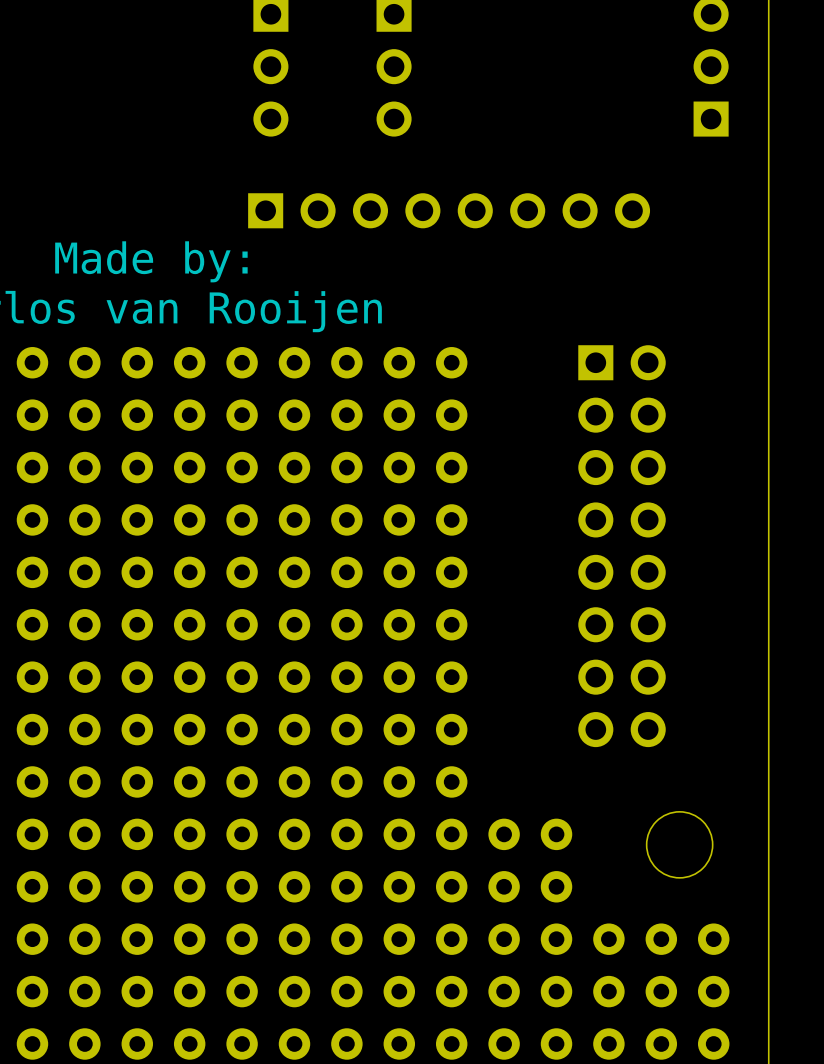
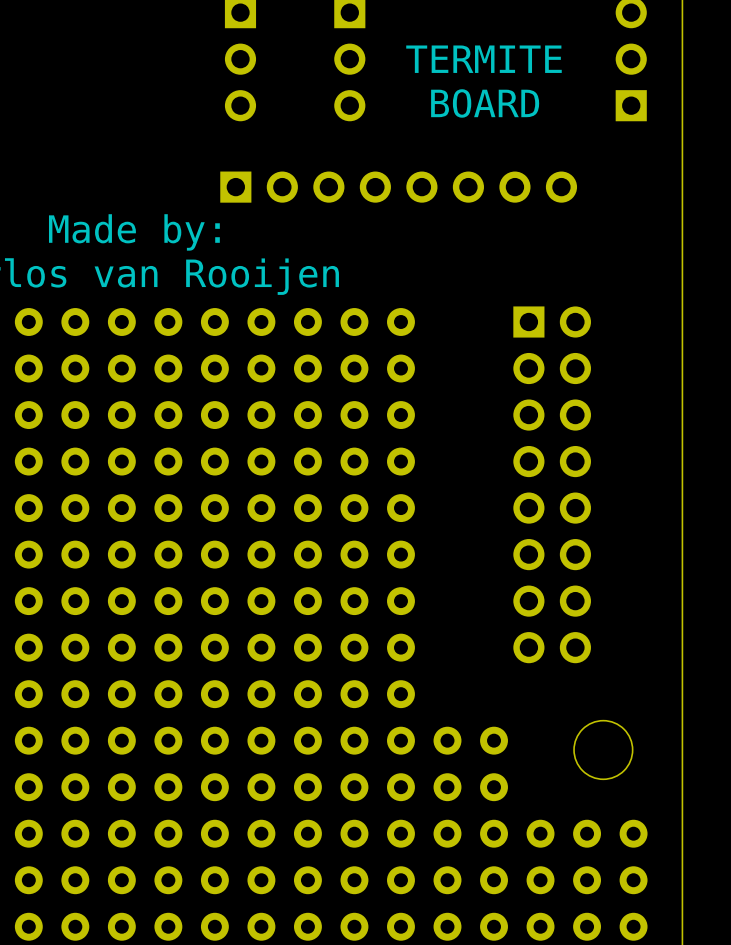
text: none -> TERMITE (483, 59)
text: none -> BOARD (485, 103)

